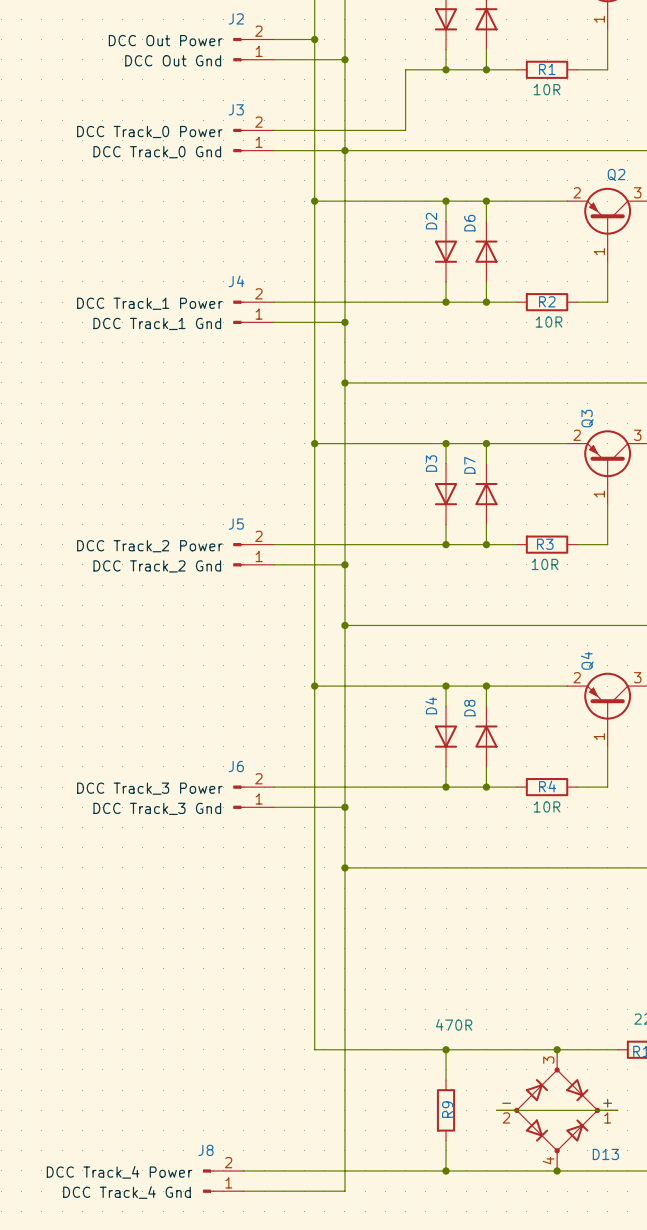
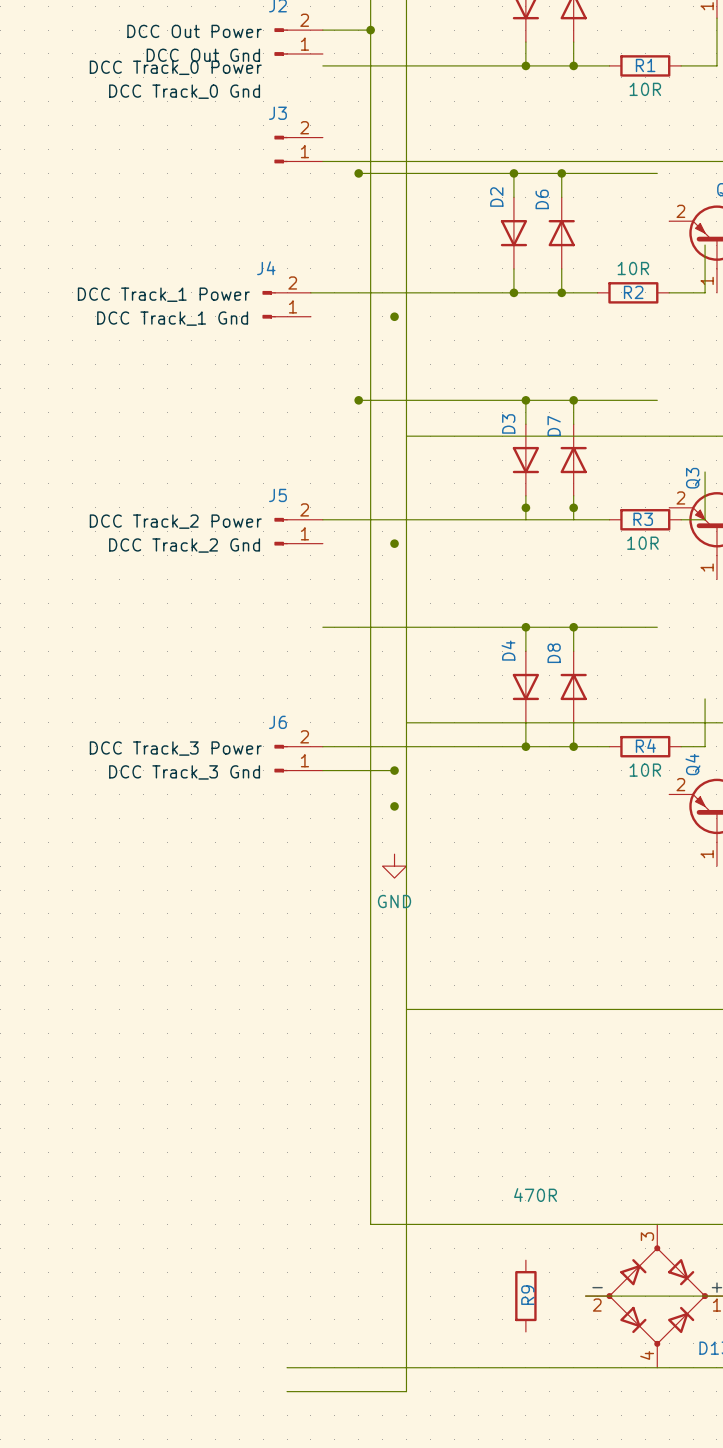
wire: (274, 59) (344, 59) -> none
junction: (344, 59) -> none
wire: (405, 69) (405, 130) (274, 130) -> (478, 65) (322, 65)
label position: DCC Track_0 Power (149, 132) -> DCC Track_0 Power (175, 67)
junction: (344, 150) -> none
label position: DCC Track_0 Gnd (157, 152) -> DCC Track_0 Gnd (184, 91)
junction: none -> (358, 173)
junction: none -> (513, 173)
junction: none -> (561, 173)
wire: (314, 201) (567, 201) -> (358, 173) (657, 173)
junction: (314, 201) -> none
wire: (446, 201) (446, 221) -> (513, 173) (513, 197)
junction: (446, 201) -> none
wire: (486, 201) (486, 221) -> (561, 173) (561, 197)
junction: (486, 201) -> none
D2 position: (446, 251) -> (513, 233)
D6 position: (486, 251) -> (561, 233)
junction: none -> (513, 292)
junction: none -> (561, 292)
wire: (607, 261) (607, 302) (577, 302) -> (705, 245) (705, 292) (669, 292)
junction: none -> (394, 316)
wire: (446, 281) (446, 302) -> (513, 268) (513, 292)
wire: (486, 281) (486, 302) -> (561, 268) (561, 292)
wire: (274, 302) (516, 302) -> (310, 292) (597, 292)
junction: (446, 302) -> none
junction: (486, 302) -> none
R2 position: (547, 302) -> (633, 292)
label position: DCC Track_1 Power (149, 303) -> DCC Track_1 Power (163, 294)
J4 position: (253, 312) -> (286, 304)
wire: (274, 322) (344, 322) -> none
junction: (344, 322) -> none
R2 value position: 10R (549, 322) -> 10R (633, 268)
label position: DCC Track_1 Gnd (157, 323) -> DCC Track_1 Gnd (172, 318)
junction: none -> (358, 400)
wire: none -> (525, 400) (525, 424)
junction: none -> (525, 400)
wire: none -> (573, 400) (573, 424)
junction: none -> (573, 400)
junction: (344, 382) -> none
wire: none -> (705, 472) (705, 519) (681, 519)
wire: (314, 443) (567, 443) -> (358, 400) (657, 400)
junction position: (314, 443) -> (394, 543)
wire: none -> (322, 519) (609, 519)
wire: (446, 453) (446, 463) -> (525, 495) (525, 507)
wire: (486, 453) (486, 463) -> (573, 495) (573, 507)
D3 position: (446, 494) -> (525, 460)
D7 position: (486, 494) -> (573, 460)
wire: (607, 504) (607, 544) (577, 544) -> none
wire: (446, 524) (446, 544) -> (525, 651) (525, 627)
wire: (486, 524) (486, 544) -> (573, 651) (573, 627)
wire: none -> (609, 627) (657, 627)
R3 position: (547, 544) -> (645, 519)
label position: DCC Track_2 Power (149, 546) -> DCC Track_2 Power (175, 521)
J5 position: (253, 554) -> (298, 531)
wire: (274, 564) (344, 564) -> none
junction: (344, 564) -> none
label position: DCC Track_2 Gnd (157, 566) -> DCC Track_2 Gnd (184, 545)
wire: none -> (705, 698) (705, 746) (681, 746)
junction: (344, 625) -> none
junction: none -> (525, 746)
junction: none -> (573, 746)
wire: none -> (322, 770) (394, 770)
junction: none -> (394, 770)
wire: (314, 686) (567, 686) -> none
junction: (314, 686) -> none
wire: (446, 686) (446, 706) -> none
junction: (446, 686) -> none
wire: (486, 686) (486, 706) -> none
junction: (486, 686) -> none
junction: none -> (394, 806)
D4 position: (446, 736) -> (525, 686)
D8 position: (486, 736) -> (573, 686)
power symbol: none -> GND (394, 866)
wire: (607, 746) (607, 787) (577, 787) -> none
wire: (446, 766) (446, 787) -> (525, 722) (525, 746)
wire: (486, 766) (486, 787) -> (573, 722) (573, 746)
wire: (274, 787) (516, 787) -> (322, 746) (609, 746)
junction: (446, 787) -> none
junction: (486, 787) -> none
R4 position: (547, 787) -> (645, 746)
label position: DCC Track_3 Power (149, 788) -> DCC Track_3 Power (175, 748)
J6 position: (253, 797) -> (298, 758)
wire: (274, 807) (344, 807) -> none
junction: (344, 807) -> none
label position: DCC Track_3 Gnd (157, 808) -> DCC Track_3 Gnd (184, 772)
junction: (344, 867) -> none
wire: (446, 1049) (446, 1080) -> none
junction: (446, 1049) -> none
junction: (557, 1049) -> none
wire: (446, 1140) (446, 1170) -> none
junction: (446, 1170) -> none
junction: (557, 1170) -> none
label: DCC Track_4 Power (119, 1172) -> none
J8: (223, 1181) -> none
label: DCC Track_4 Gnd (126, 1192) -> none

